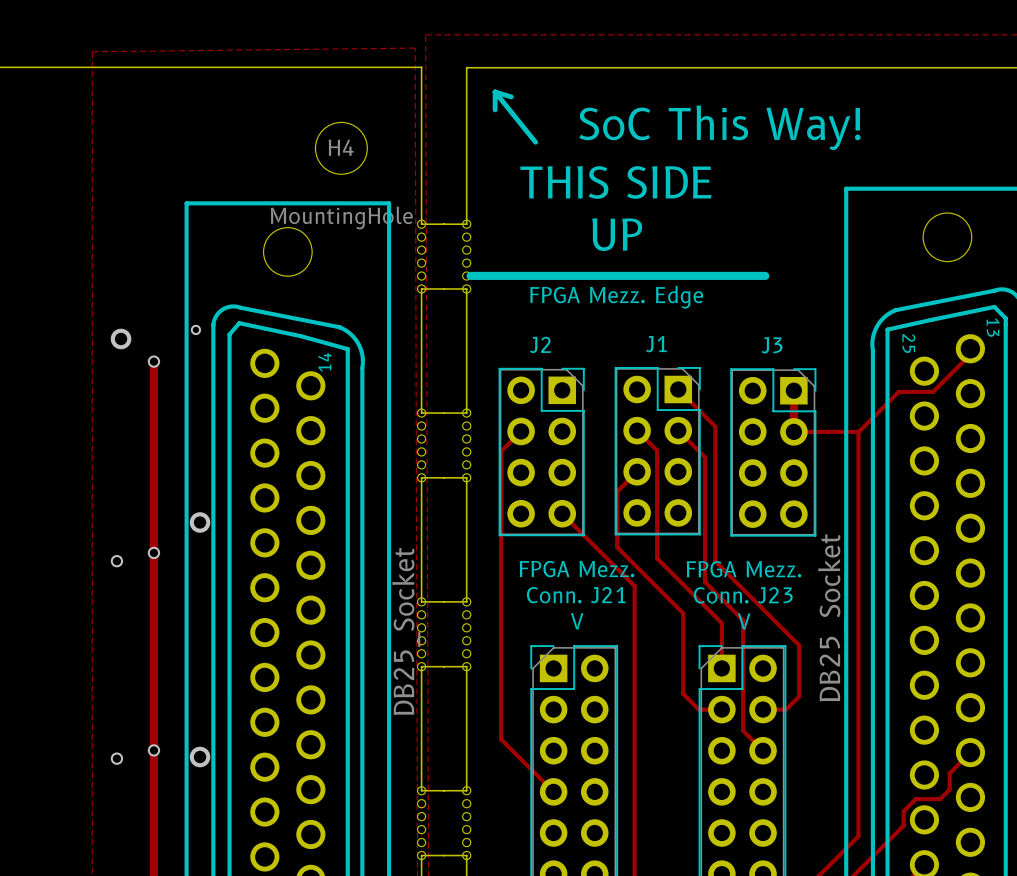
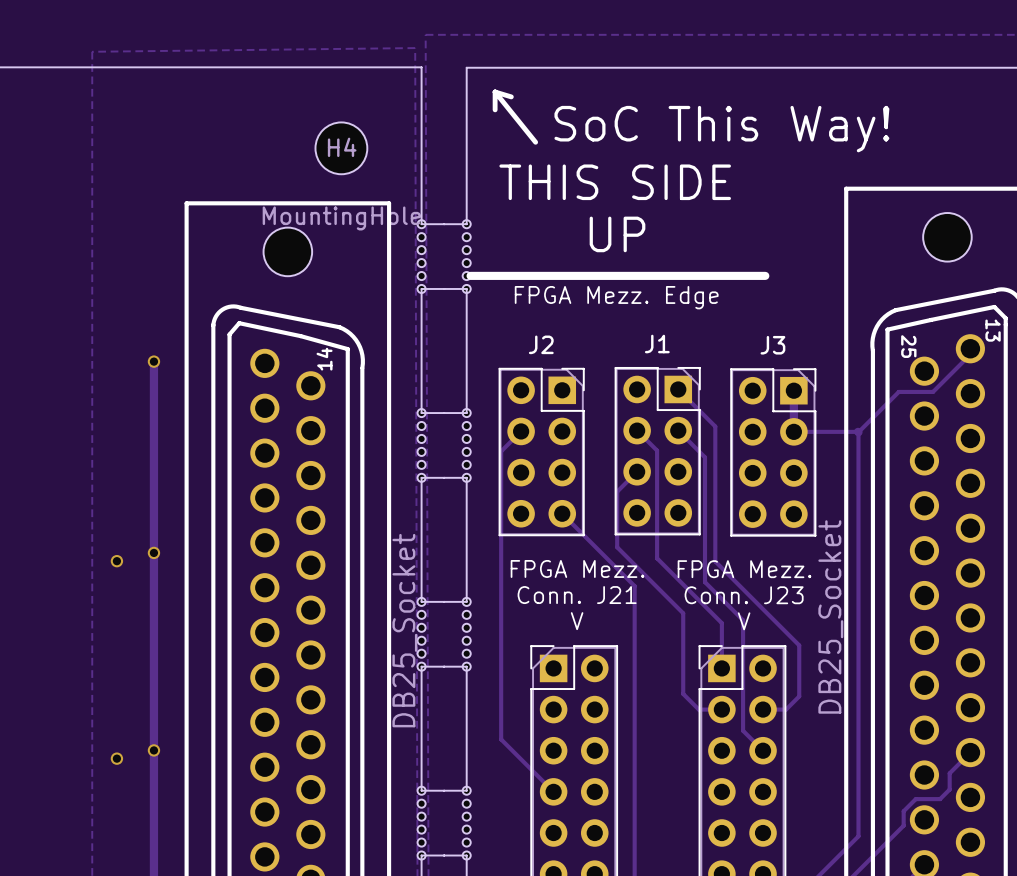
via: (195, 329) -> none
via: (121, 338) -> none
via: (200, 522) -> none
via: (200, 757) -> none

